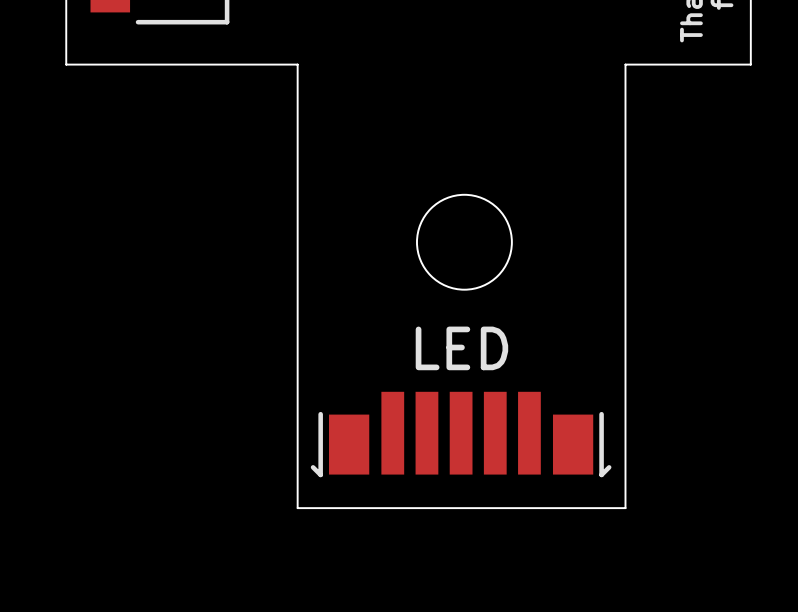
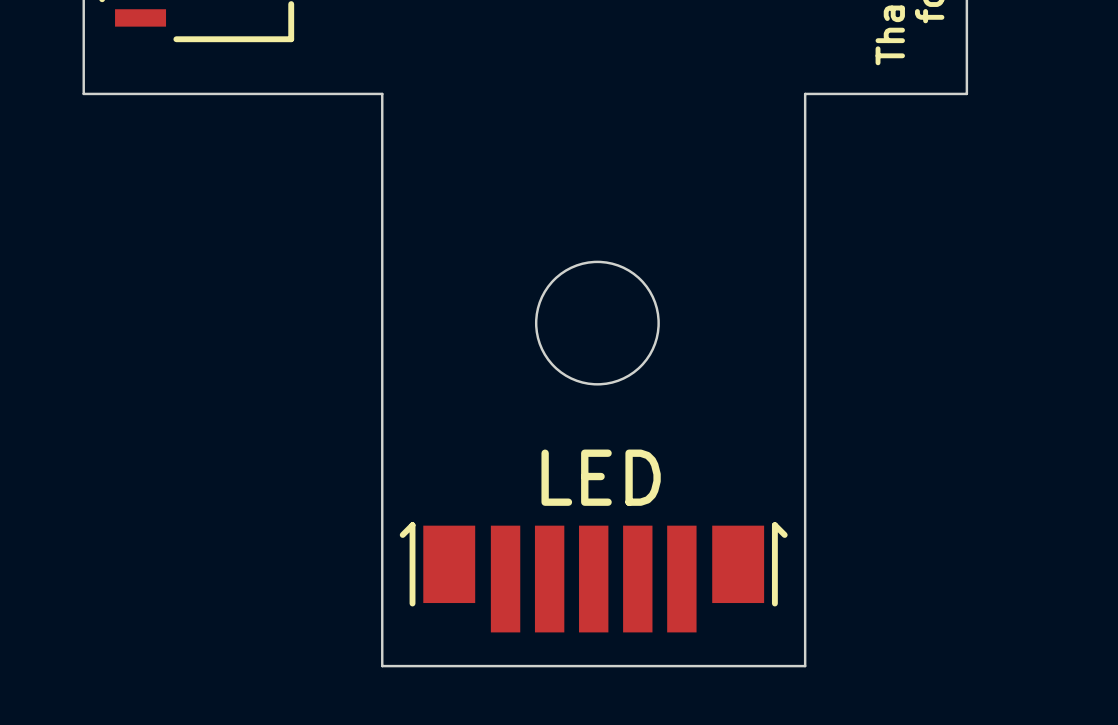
part footprint: [310, 391, 612, 478] -> [399, 522, 788, 633]

